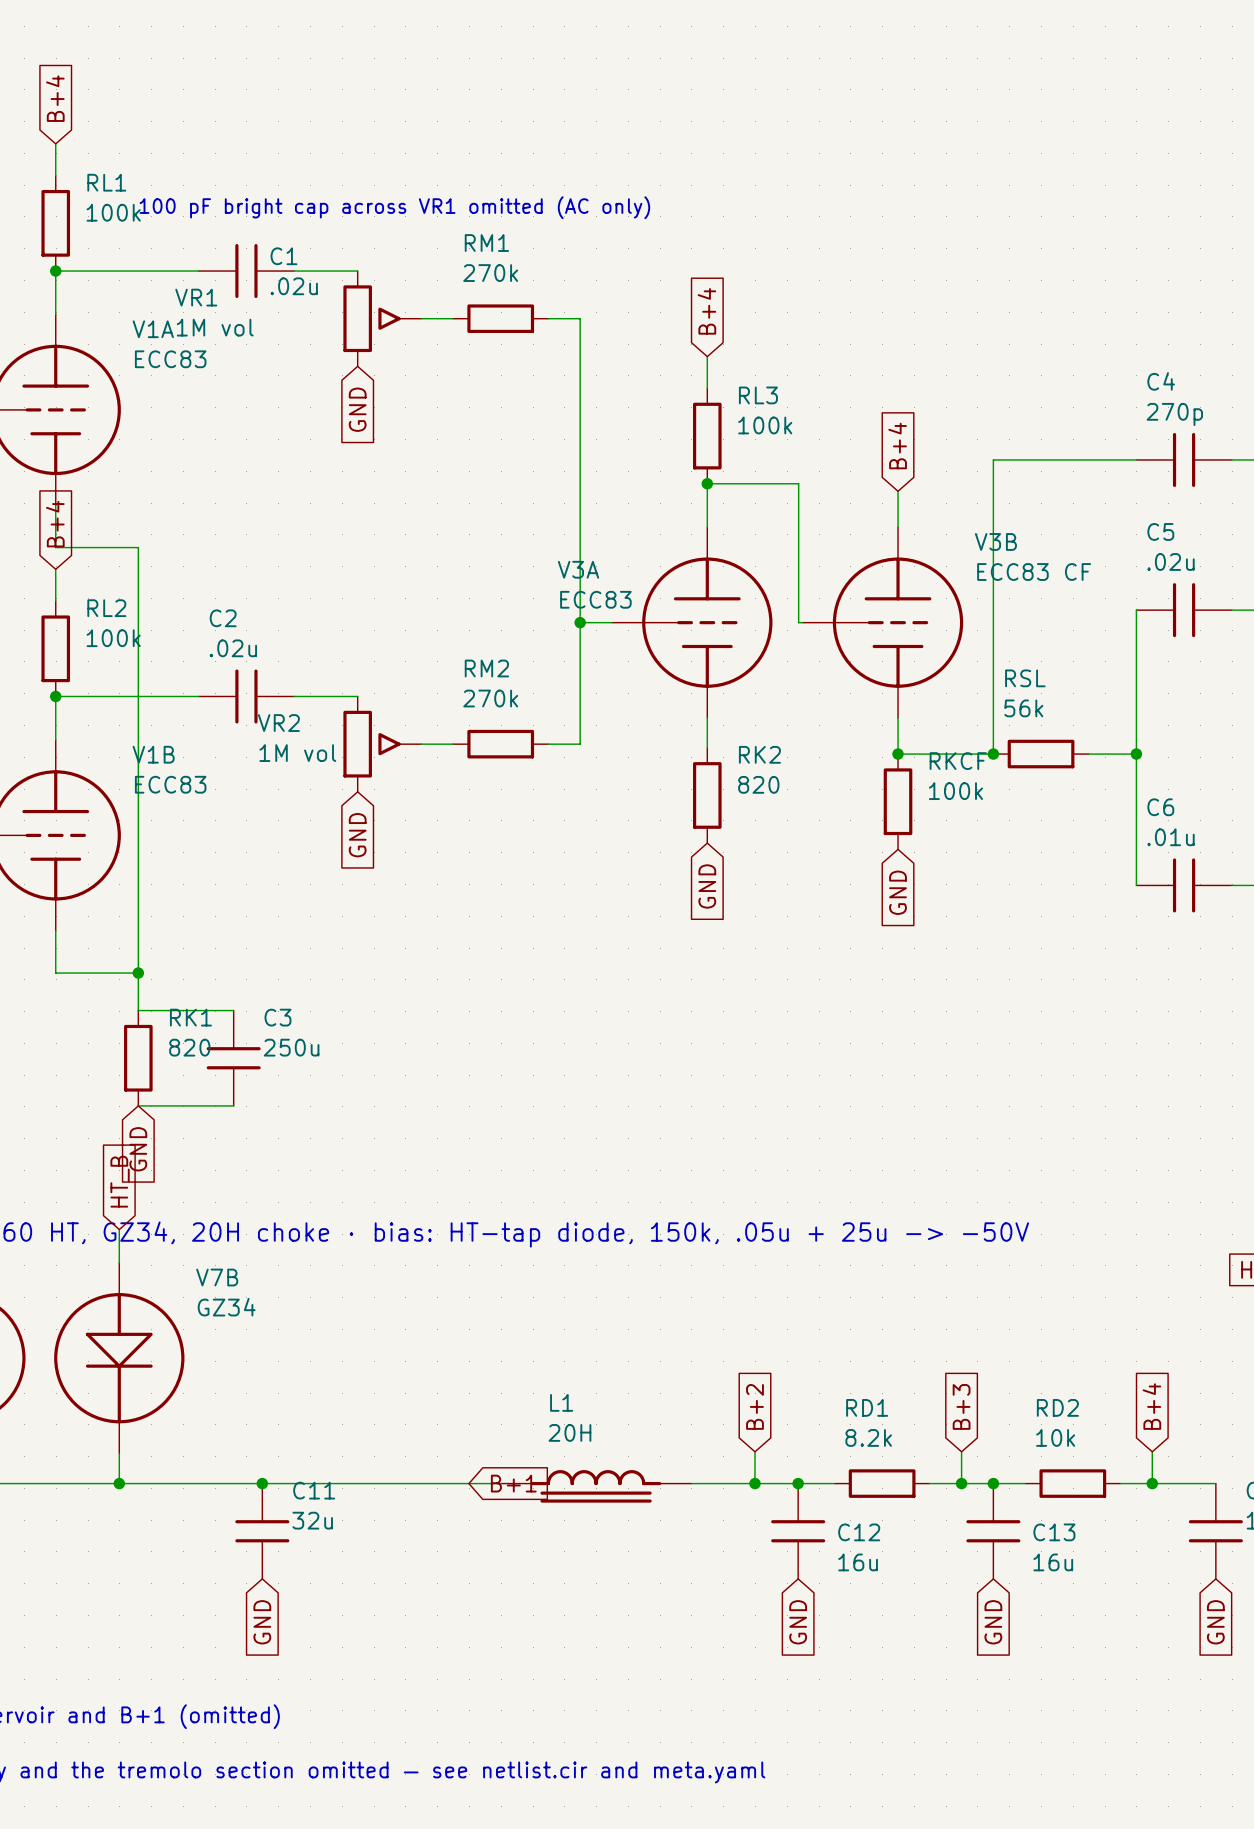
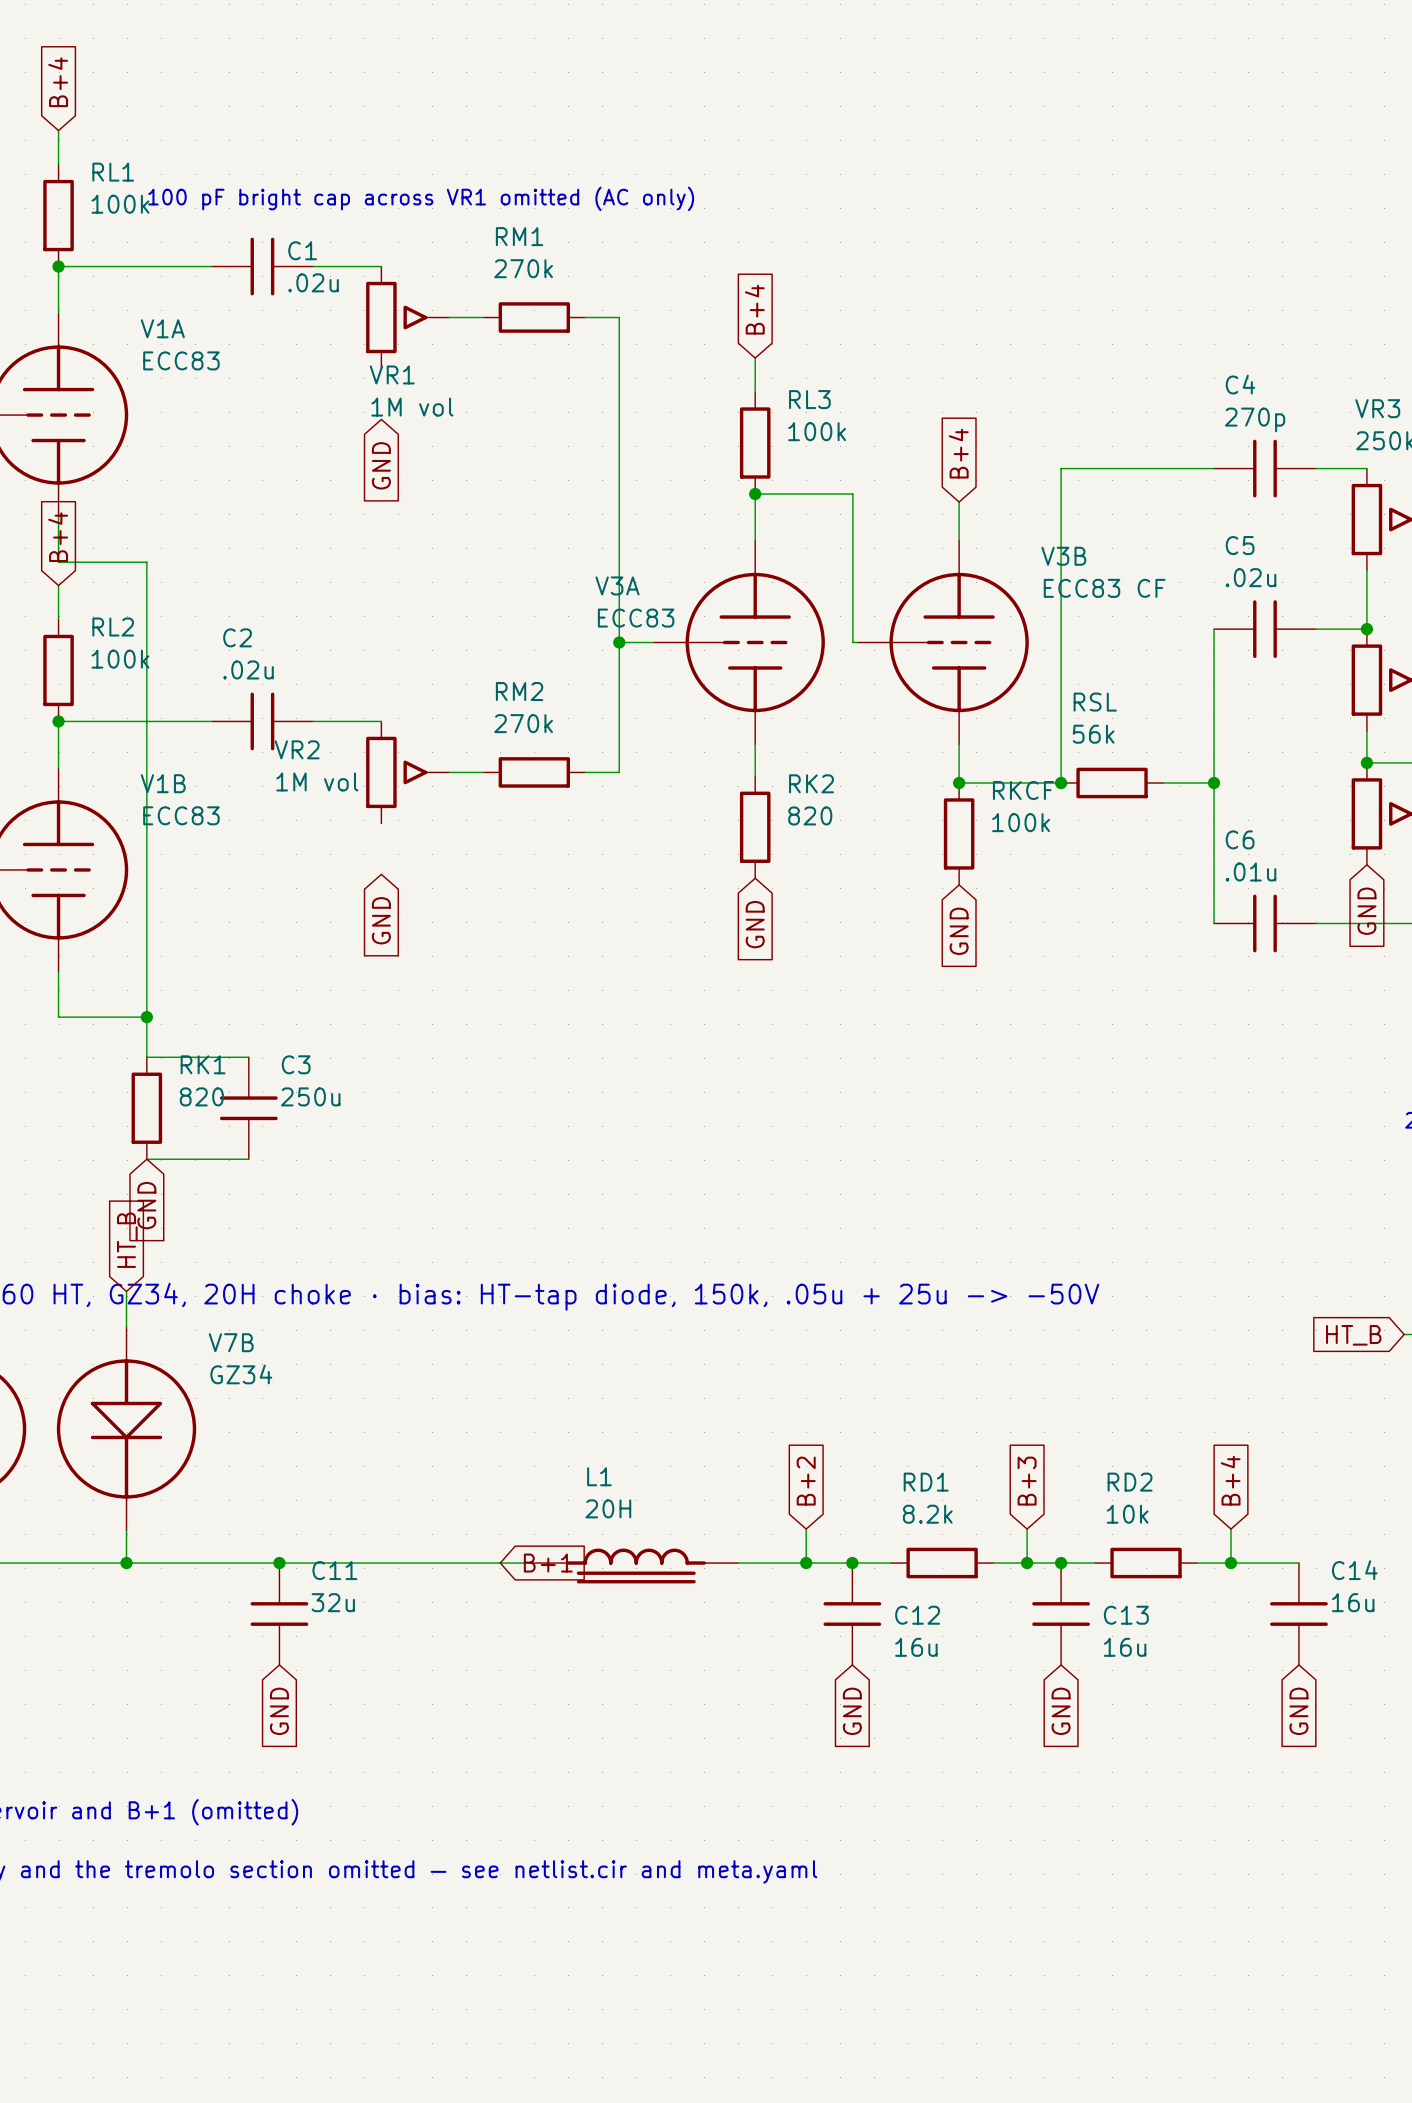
VR1 name position: VR1 (196, 297) -> VR1 (392, 374)
VR1 value position: 1M vol (215, 327) -> 1M vol (412, 407)
global label position: GND (357, 409) -> GND (381, 465)
global label position: GND (357, 835) -> GND (381, 920)

